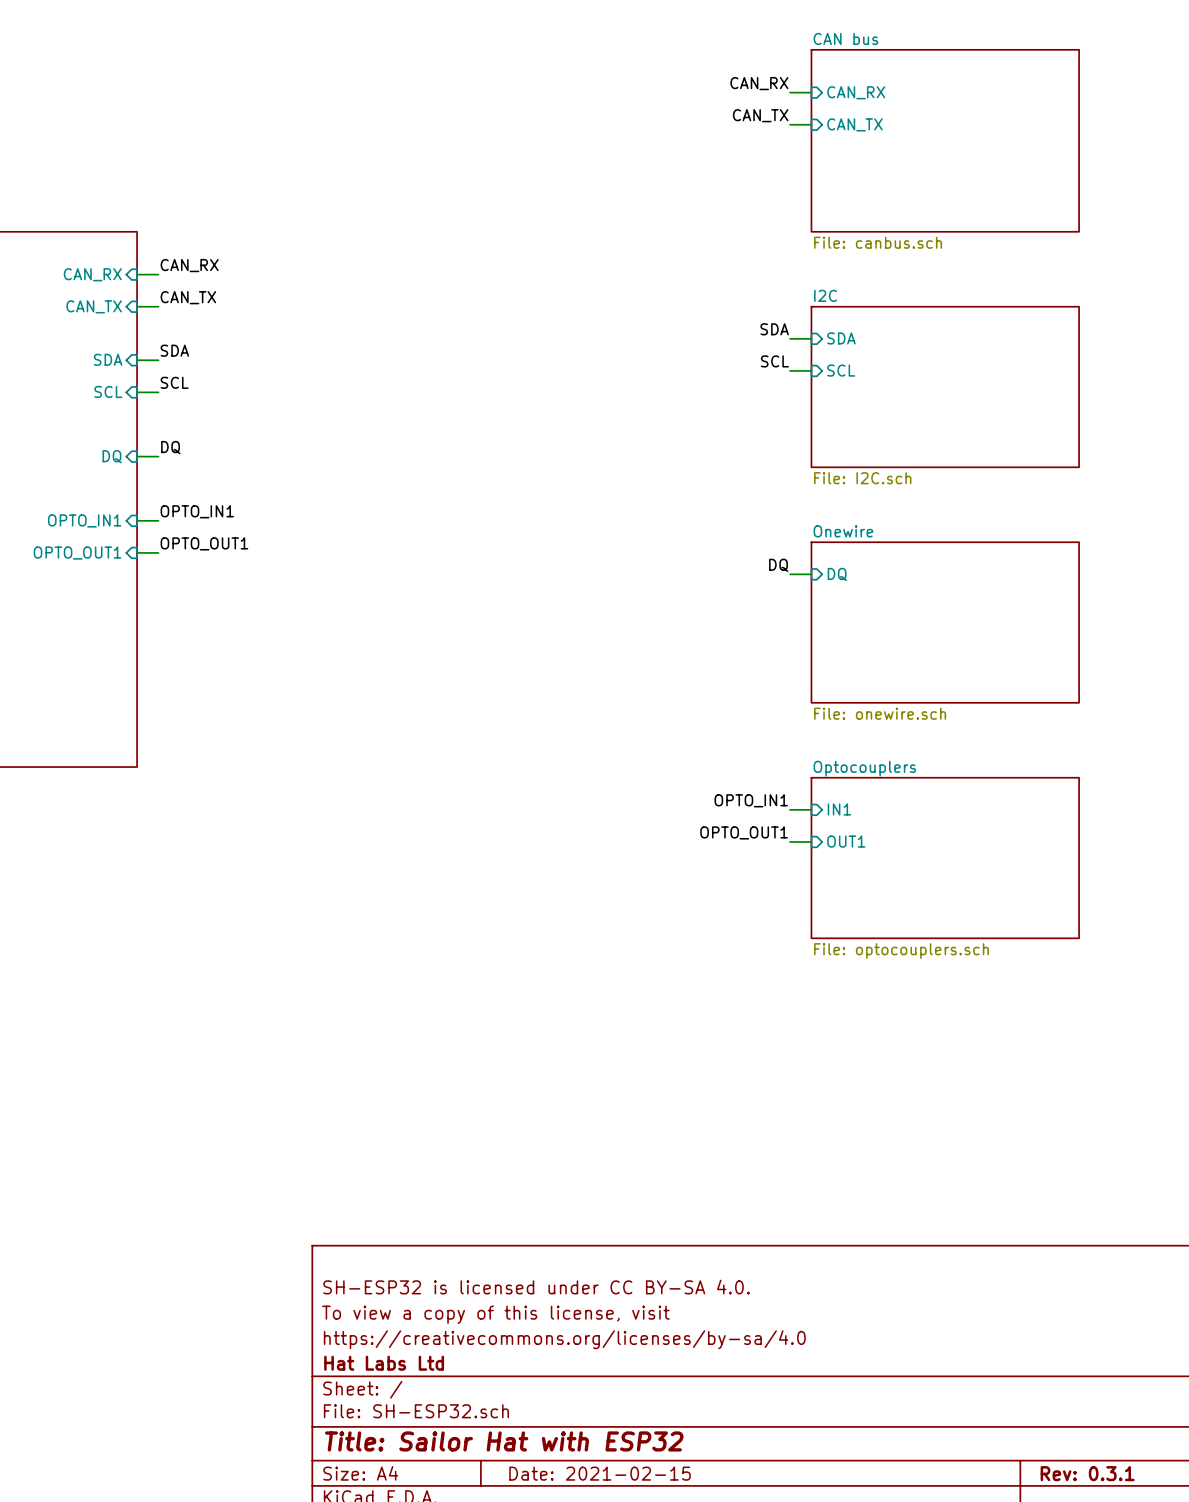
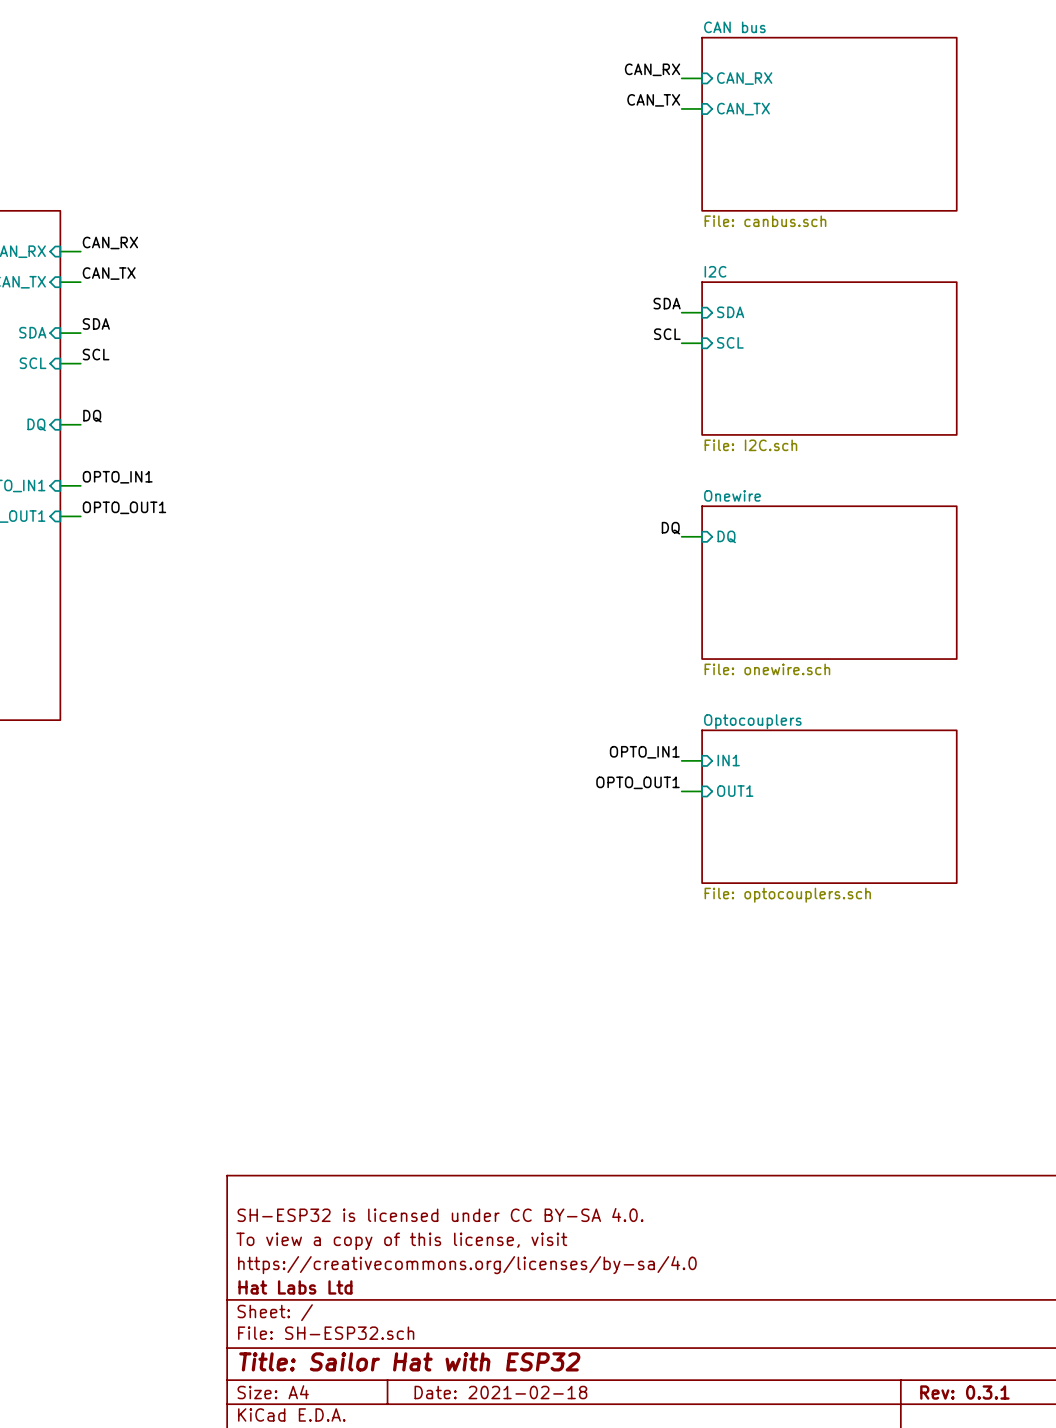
title block: Date: 2021-02-15 (600, 1473) -> Date: 2021-02-18 (500, 1392)

